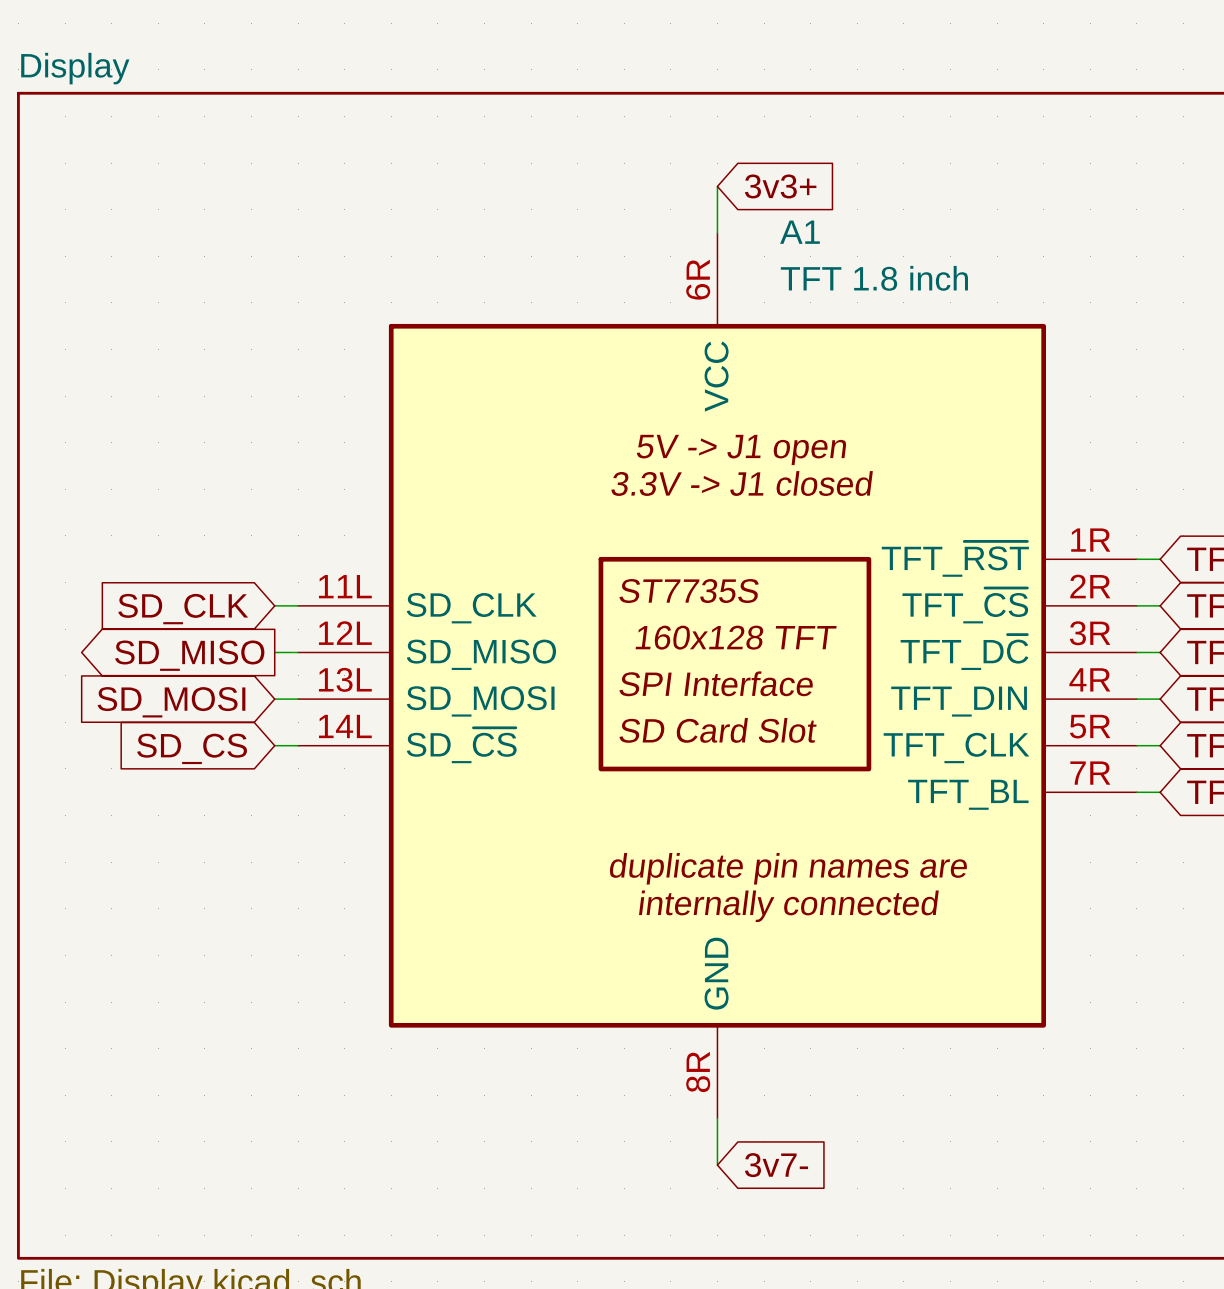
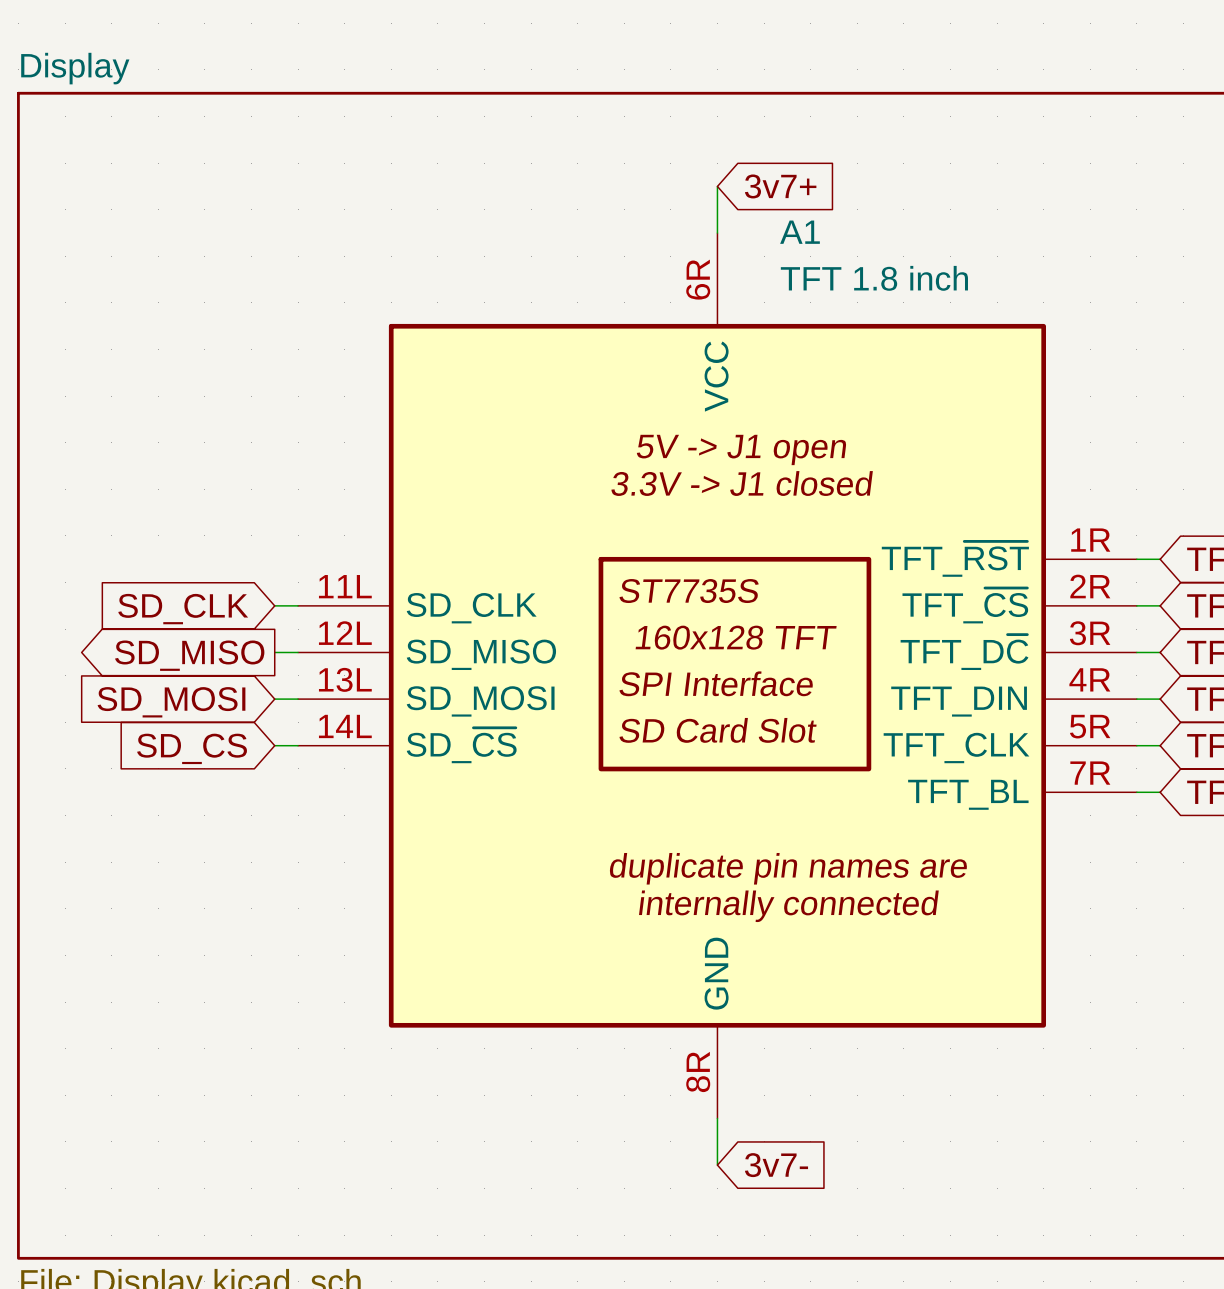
global label: 3v3+ (780, 186) -> 3v7+ (780, 186)

